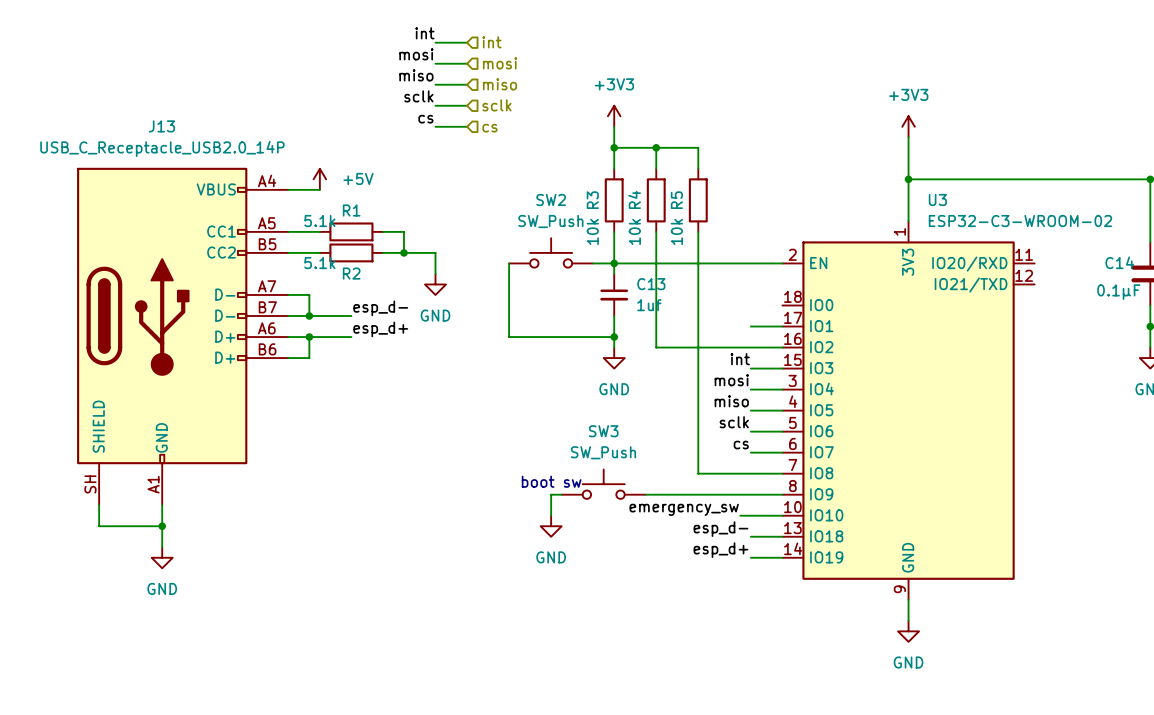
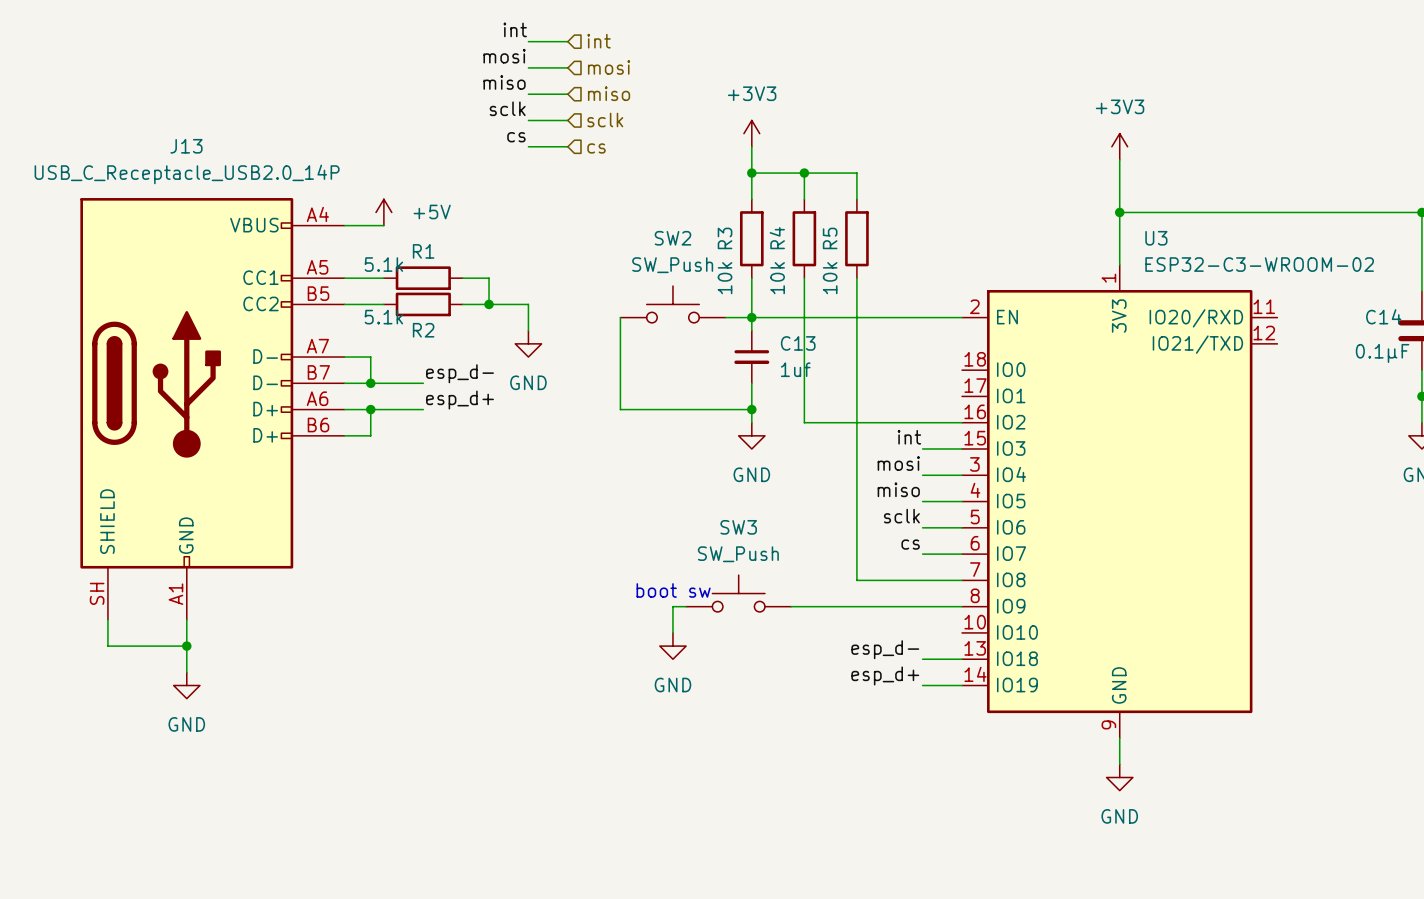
wire: (750, 326) (782, 326) -> none
label: emergency_sw (684, 509) -> none
wire: (740, 515) (782, 515) -> none

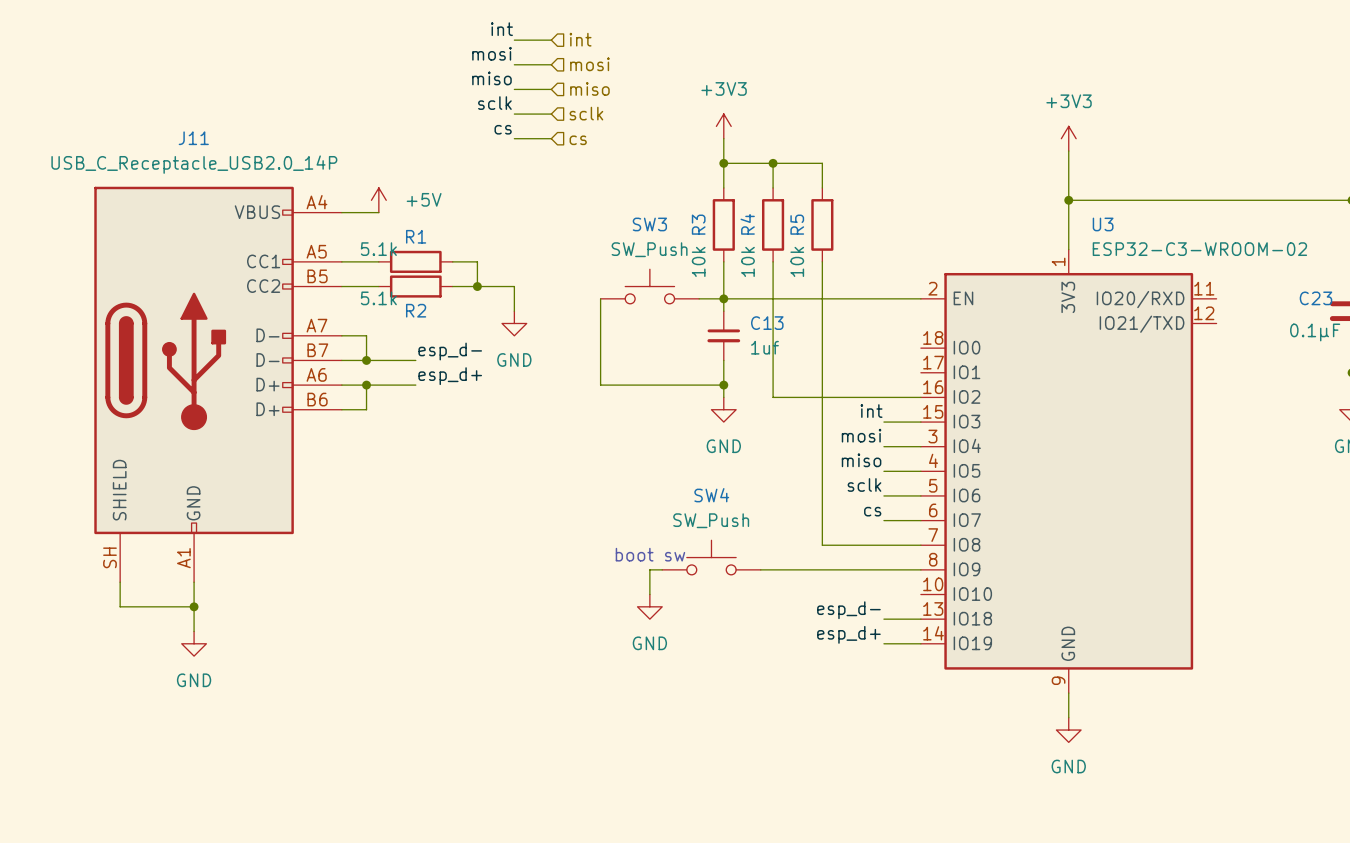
J13 name: J13 (186, 146) -> J11 (193, 138)
SW2 name: SW2 (672, 238) -> SW3 (649, 224)
C14 name: C14 (1383, 316) -> C23 (1315, 298)
SW3 name: SW3 (738, 527) -> SW4 (711, 495)

